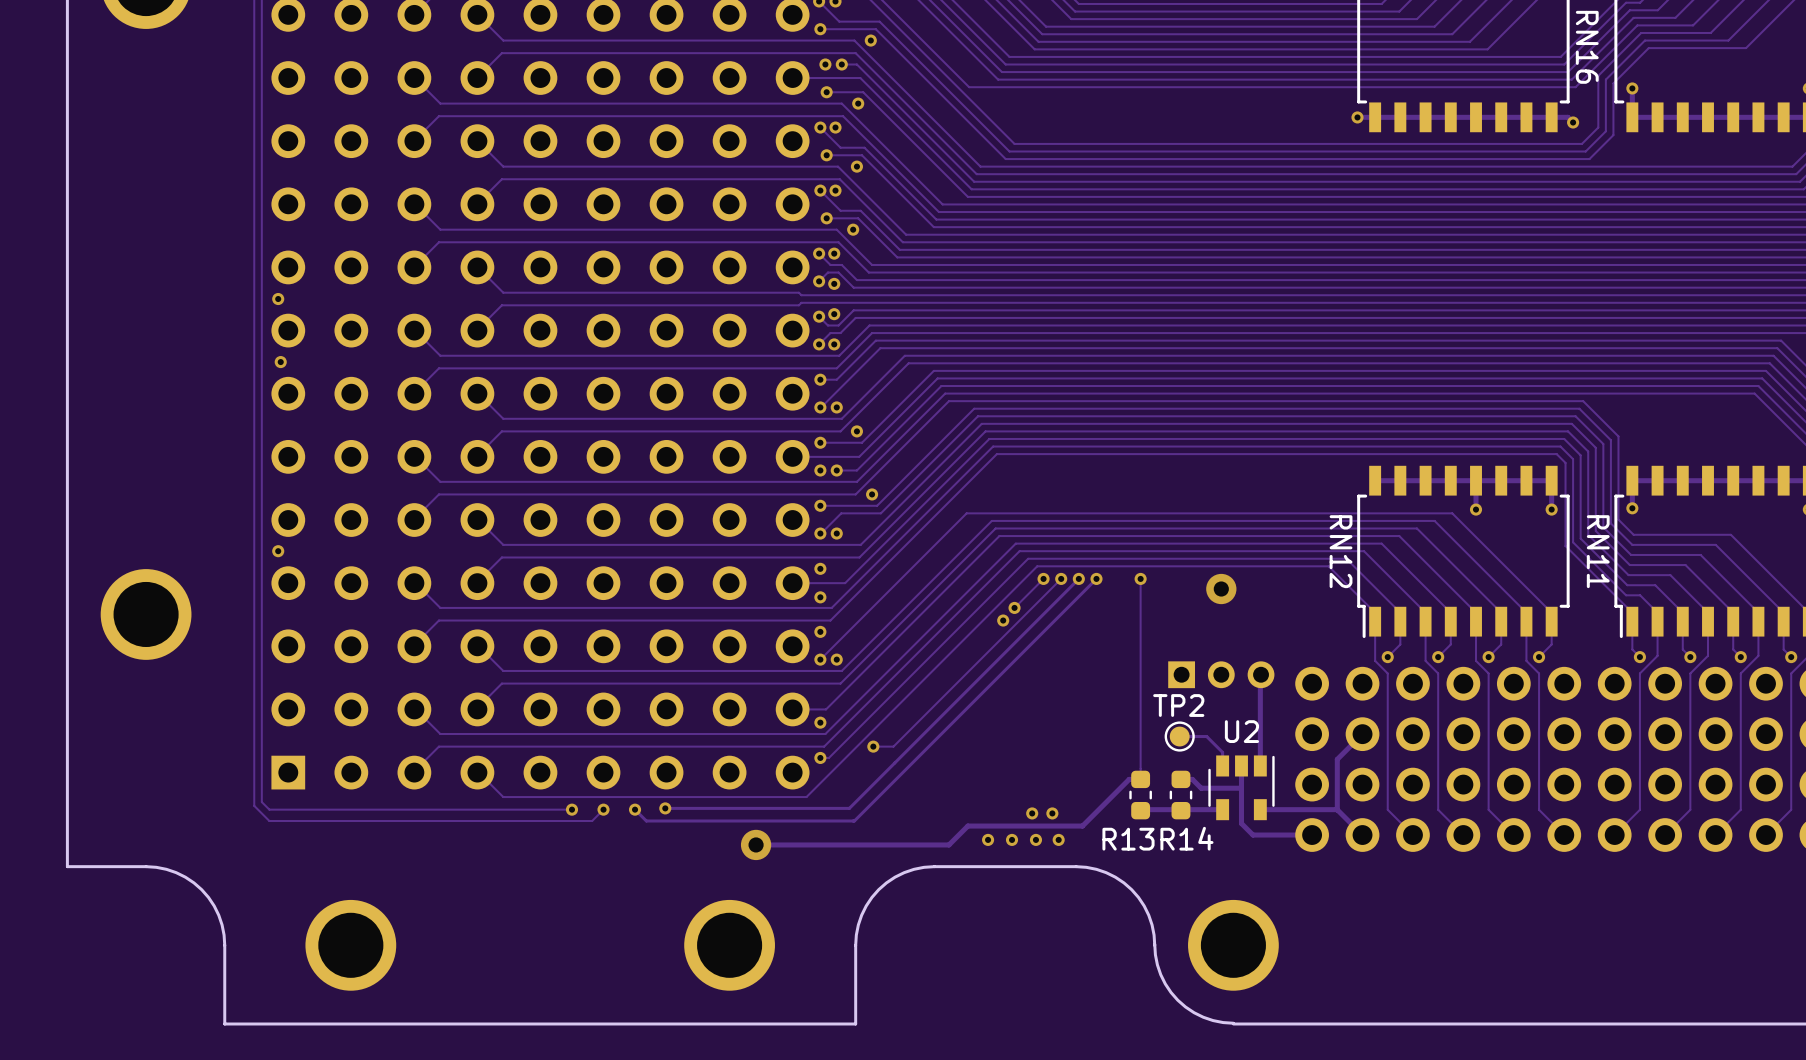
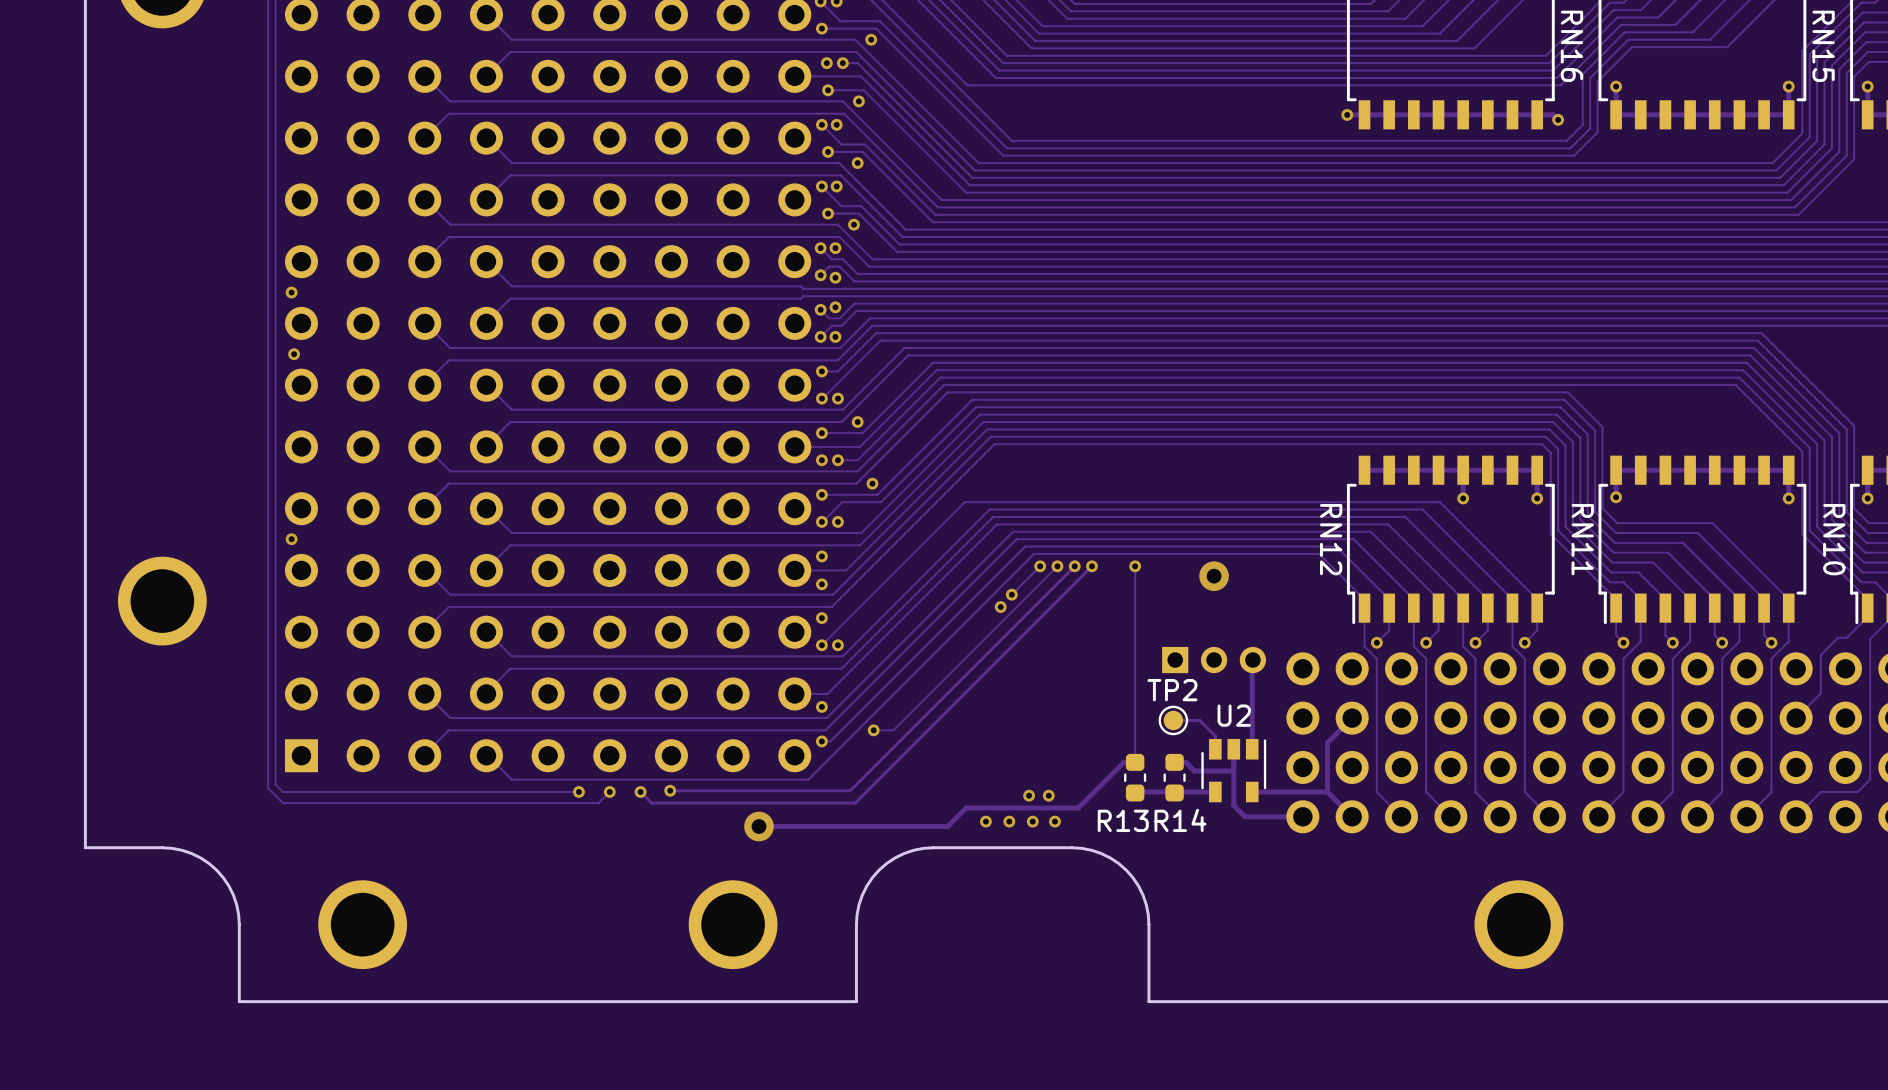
board edge: (1154, 944) (1160, 974) (1177, 1000) (1203, 1017) (1233, 1023) -> (1148, 924) (1148, 1001) (1225, 1001)
part position: (1233, 945) -> (1518, 924)

